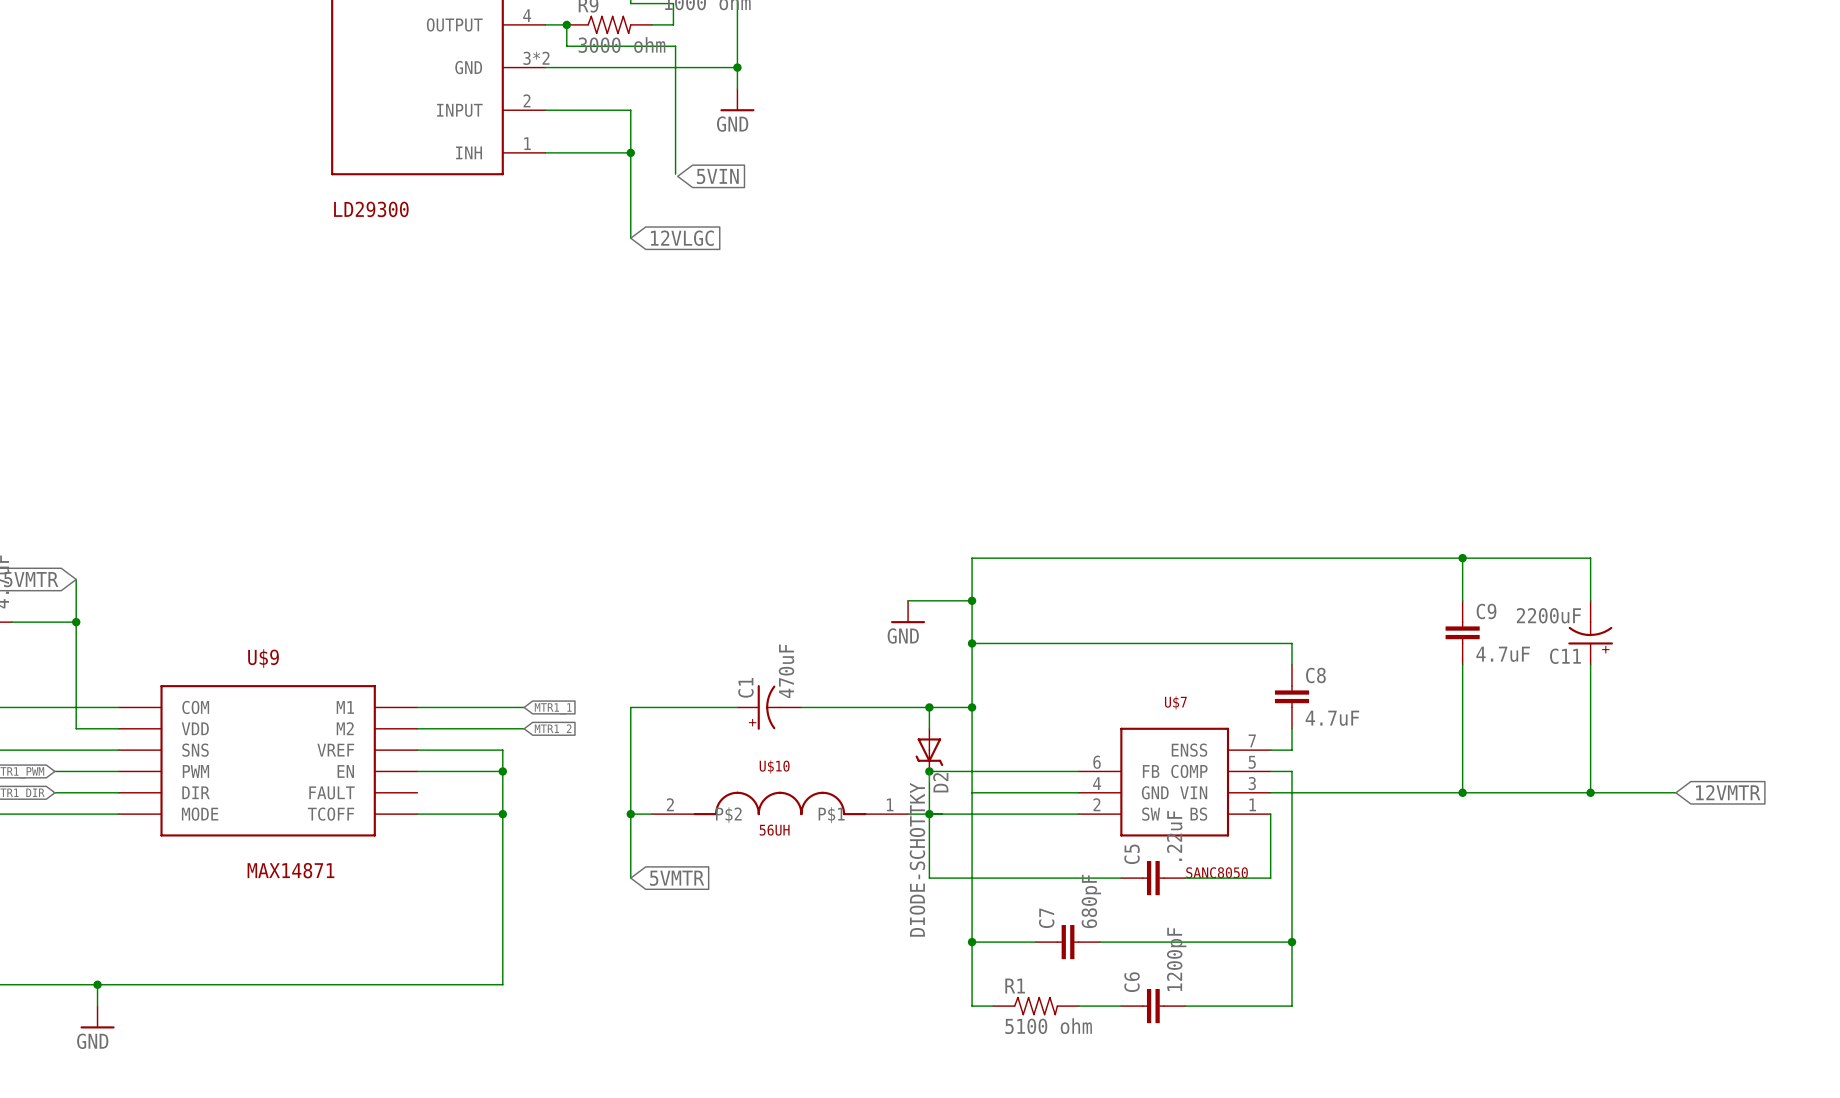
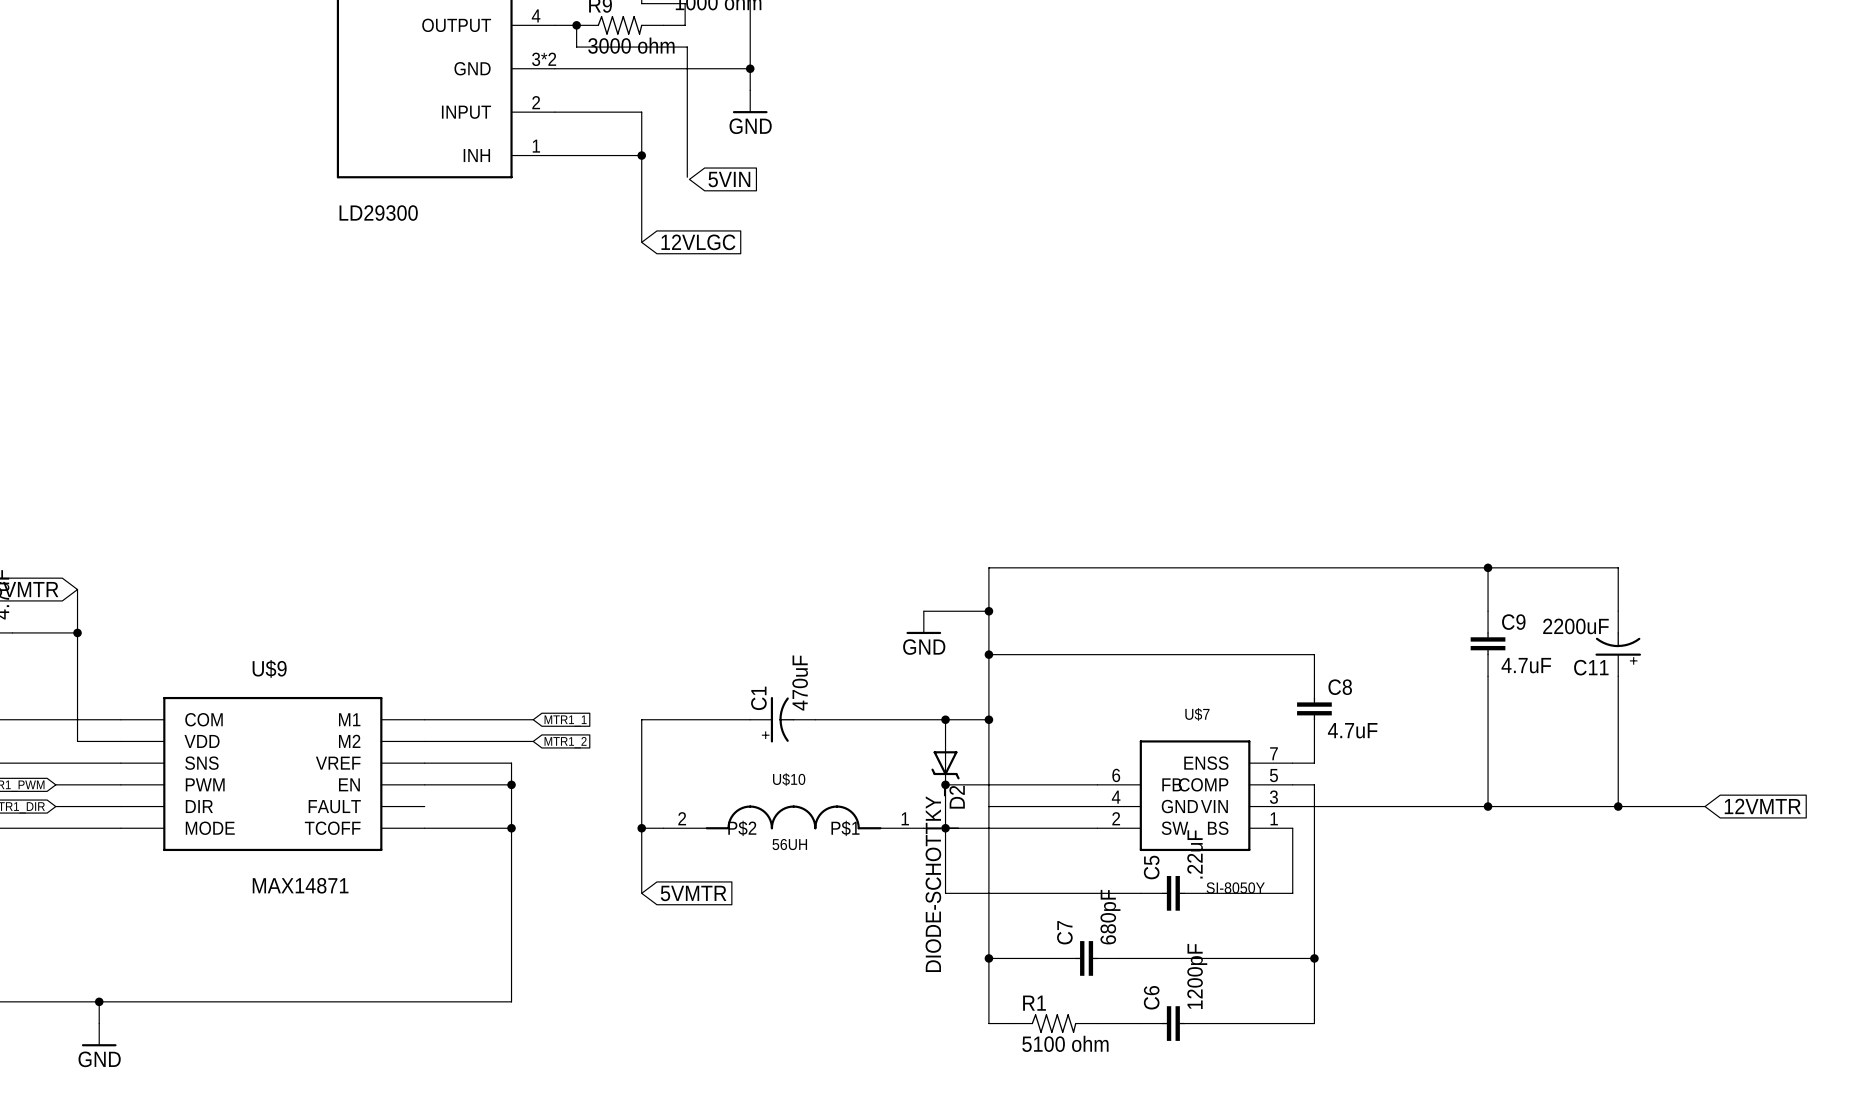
U$7 value: SANC8050 (1217, 872) -> SI-8050Y (1235, 887)

